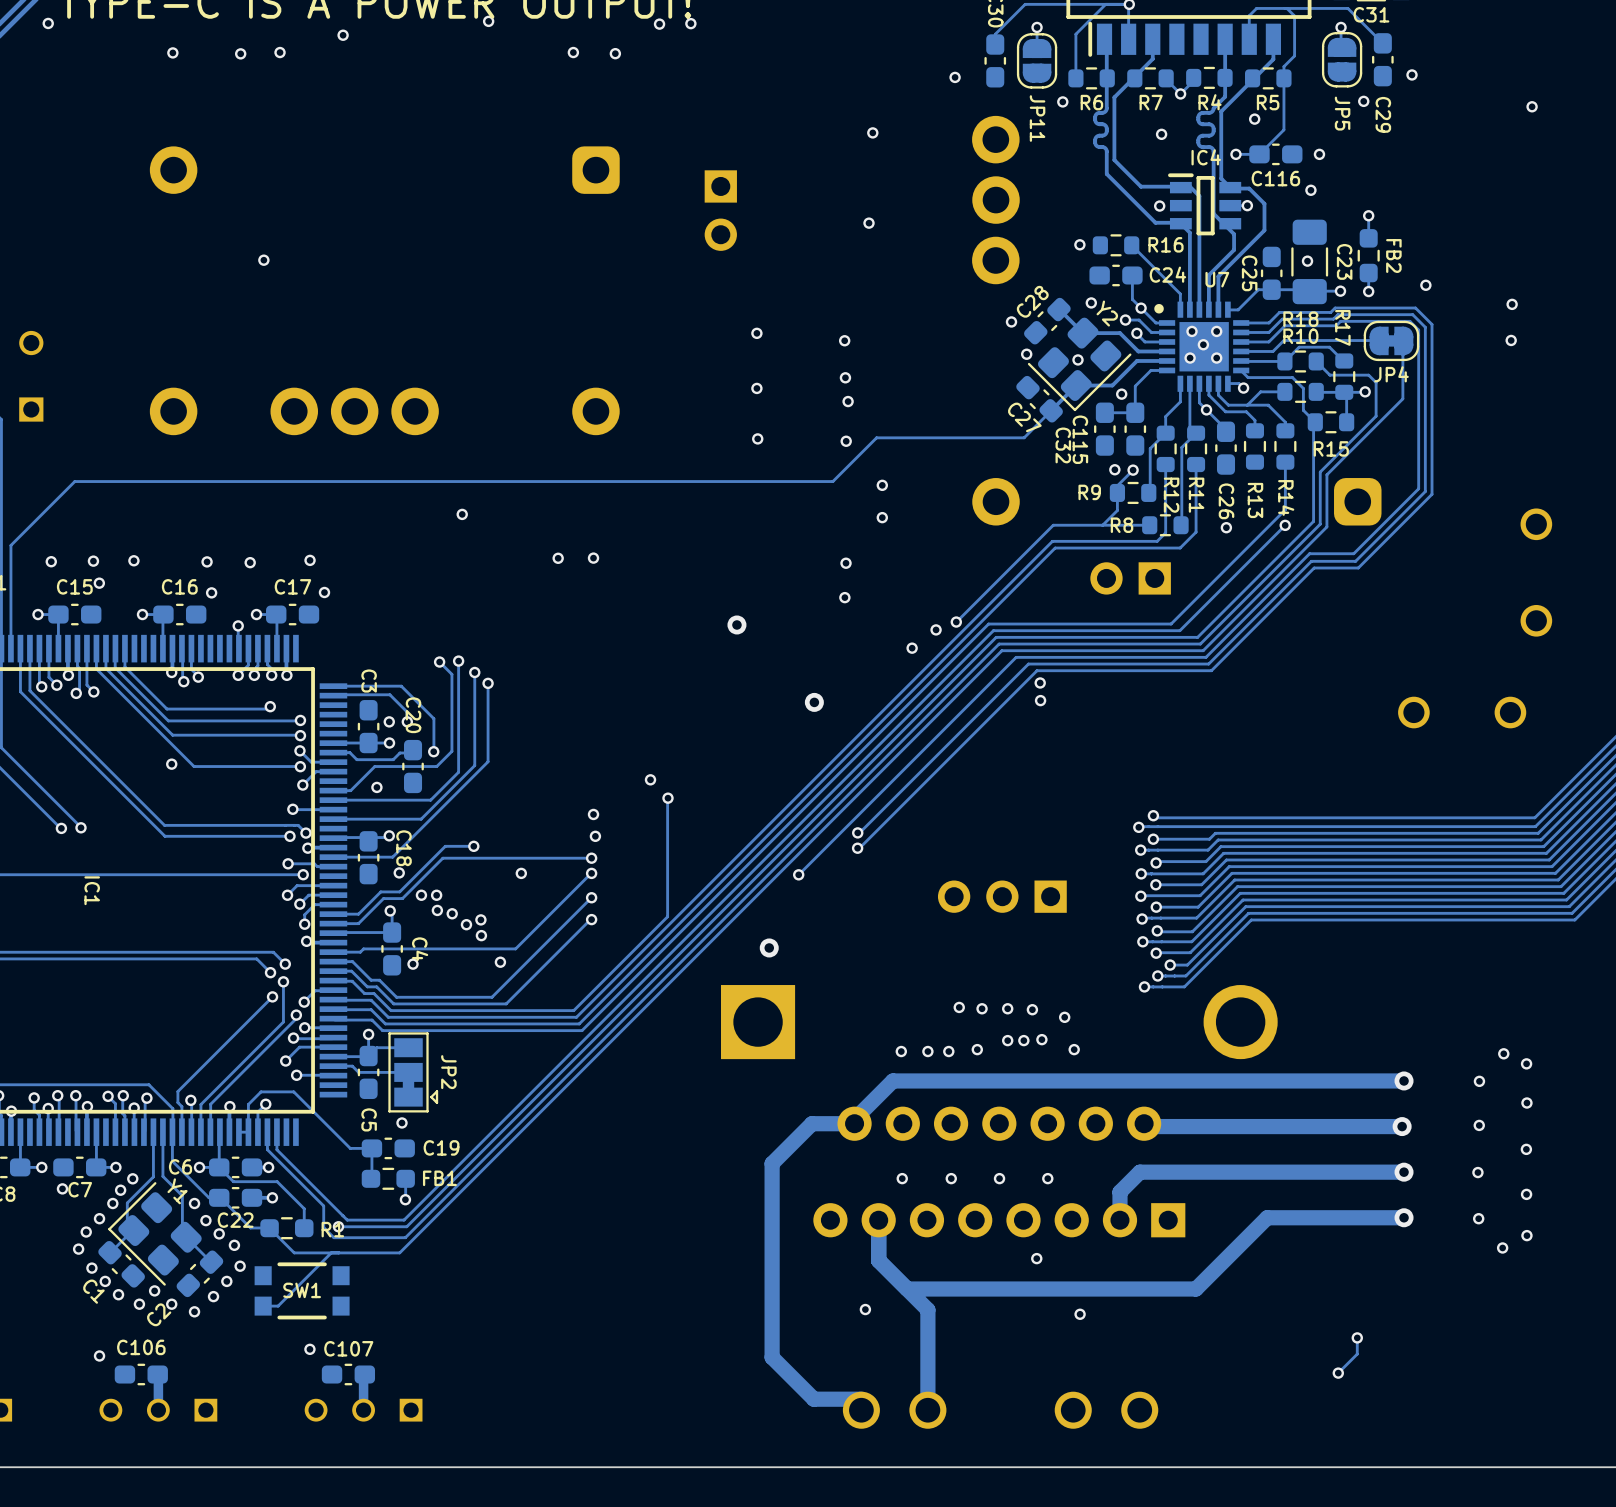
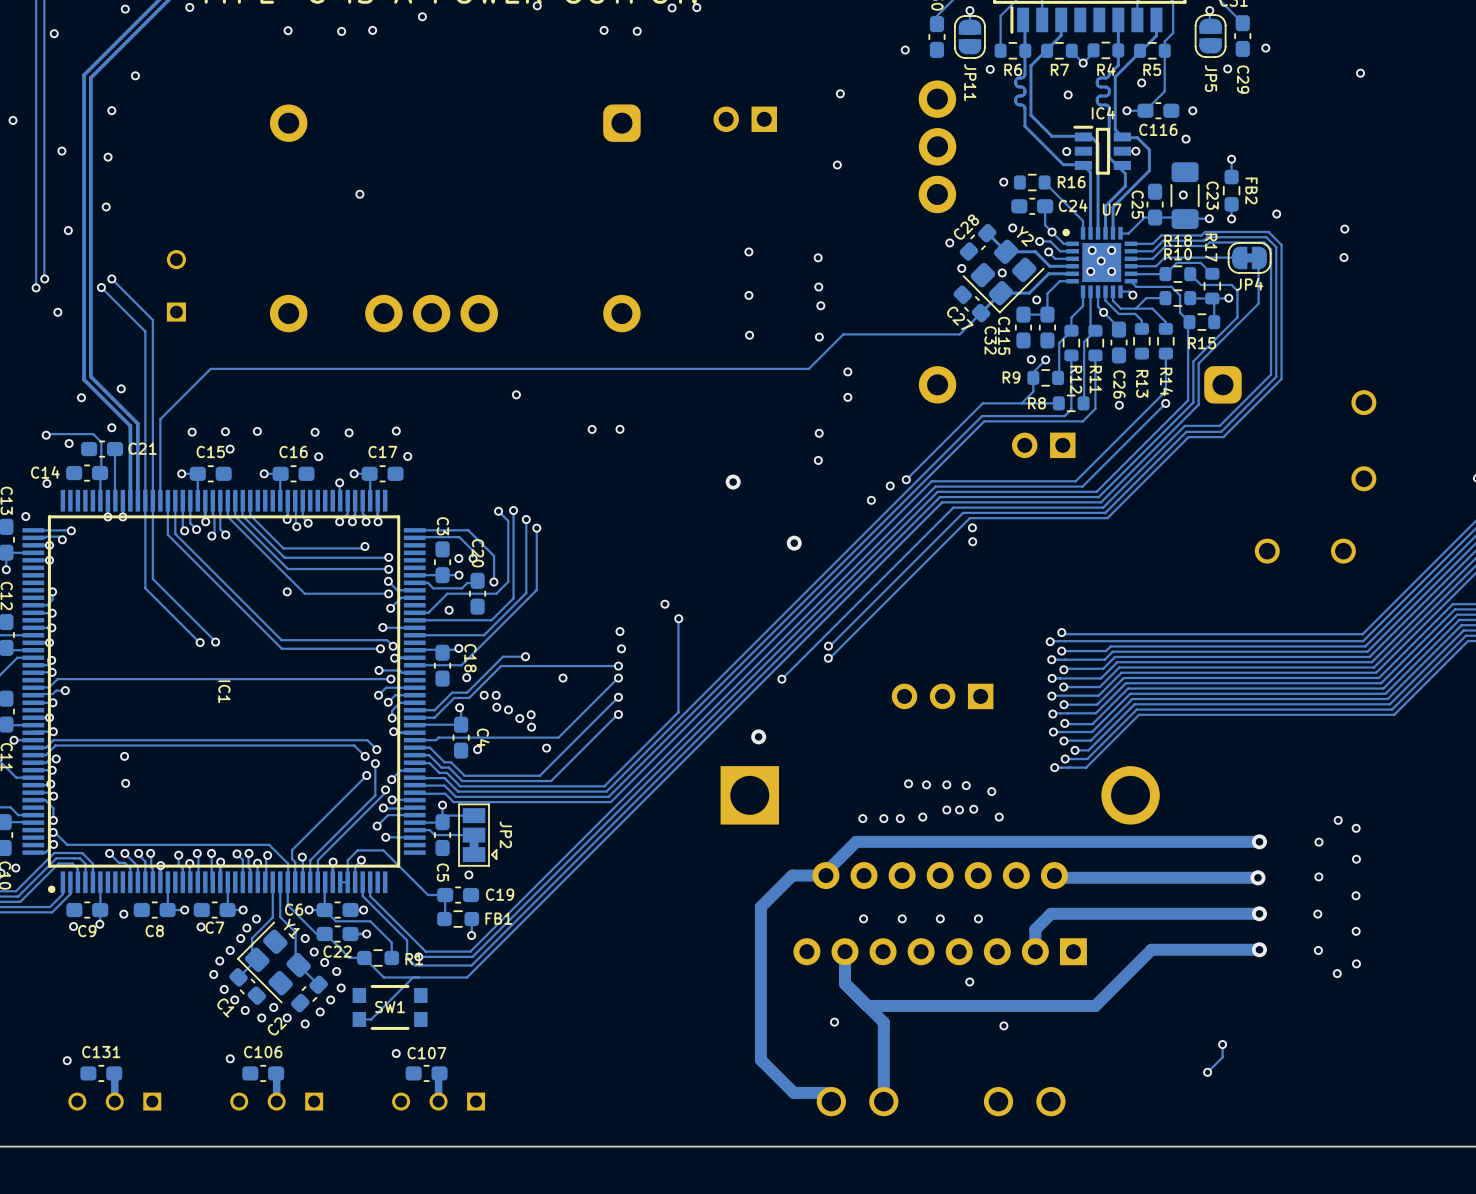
part rotation: 0° (720, 210) -> 90° clockwise (745, 119)
part position: (720, 210) -> (745, 119)

